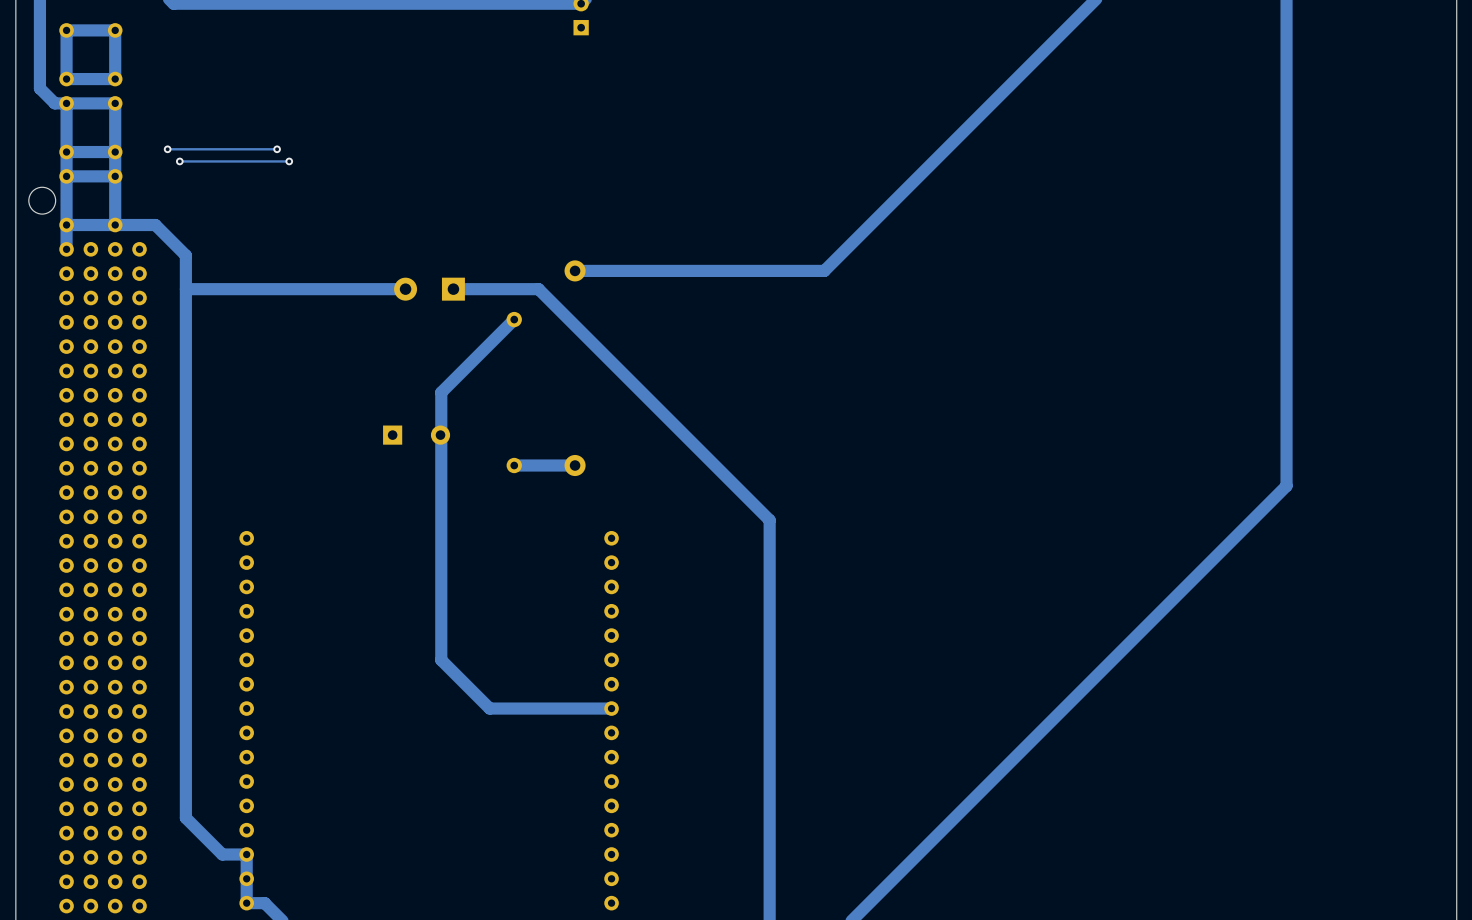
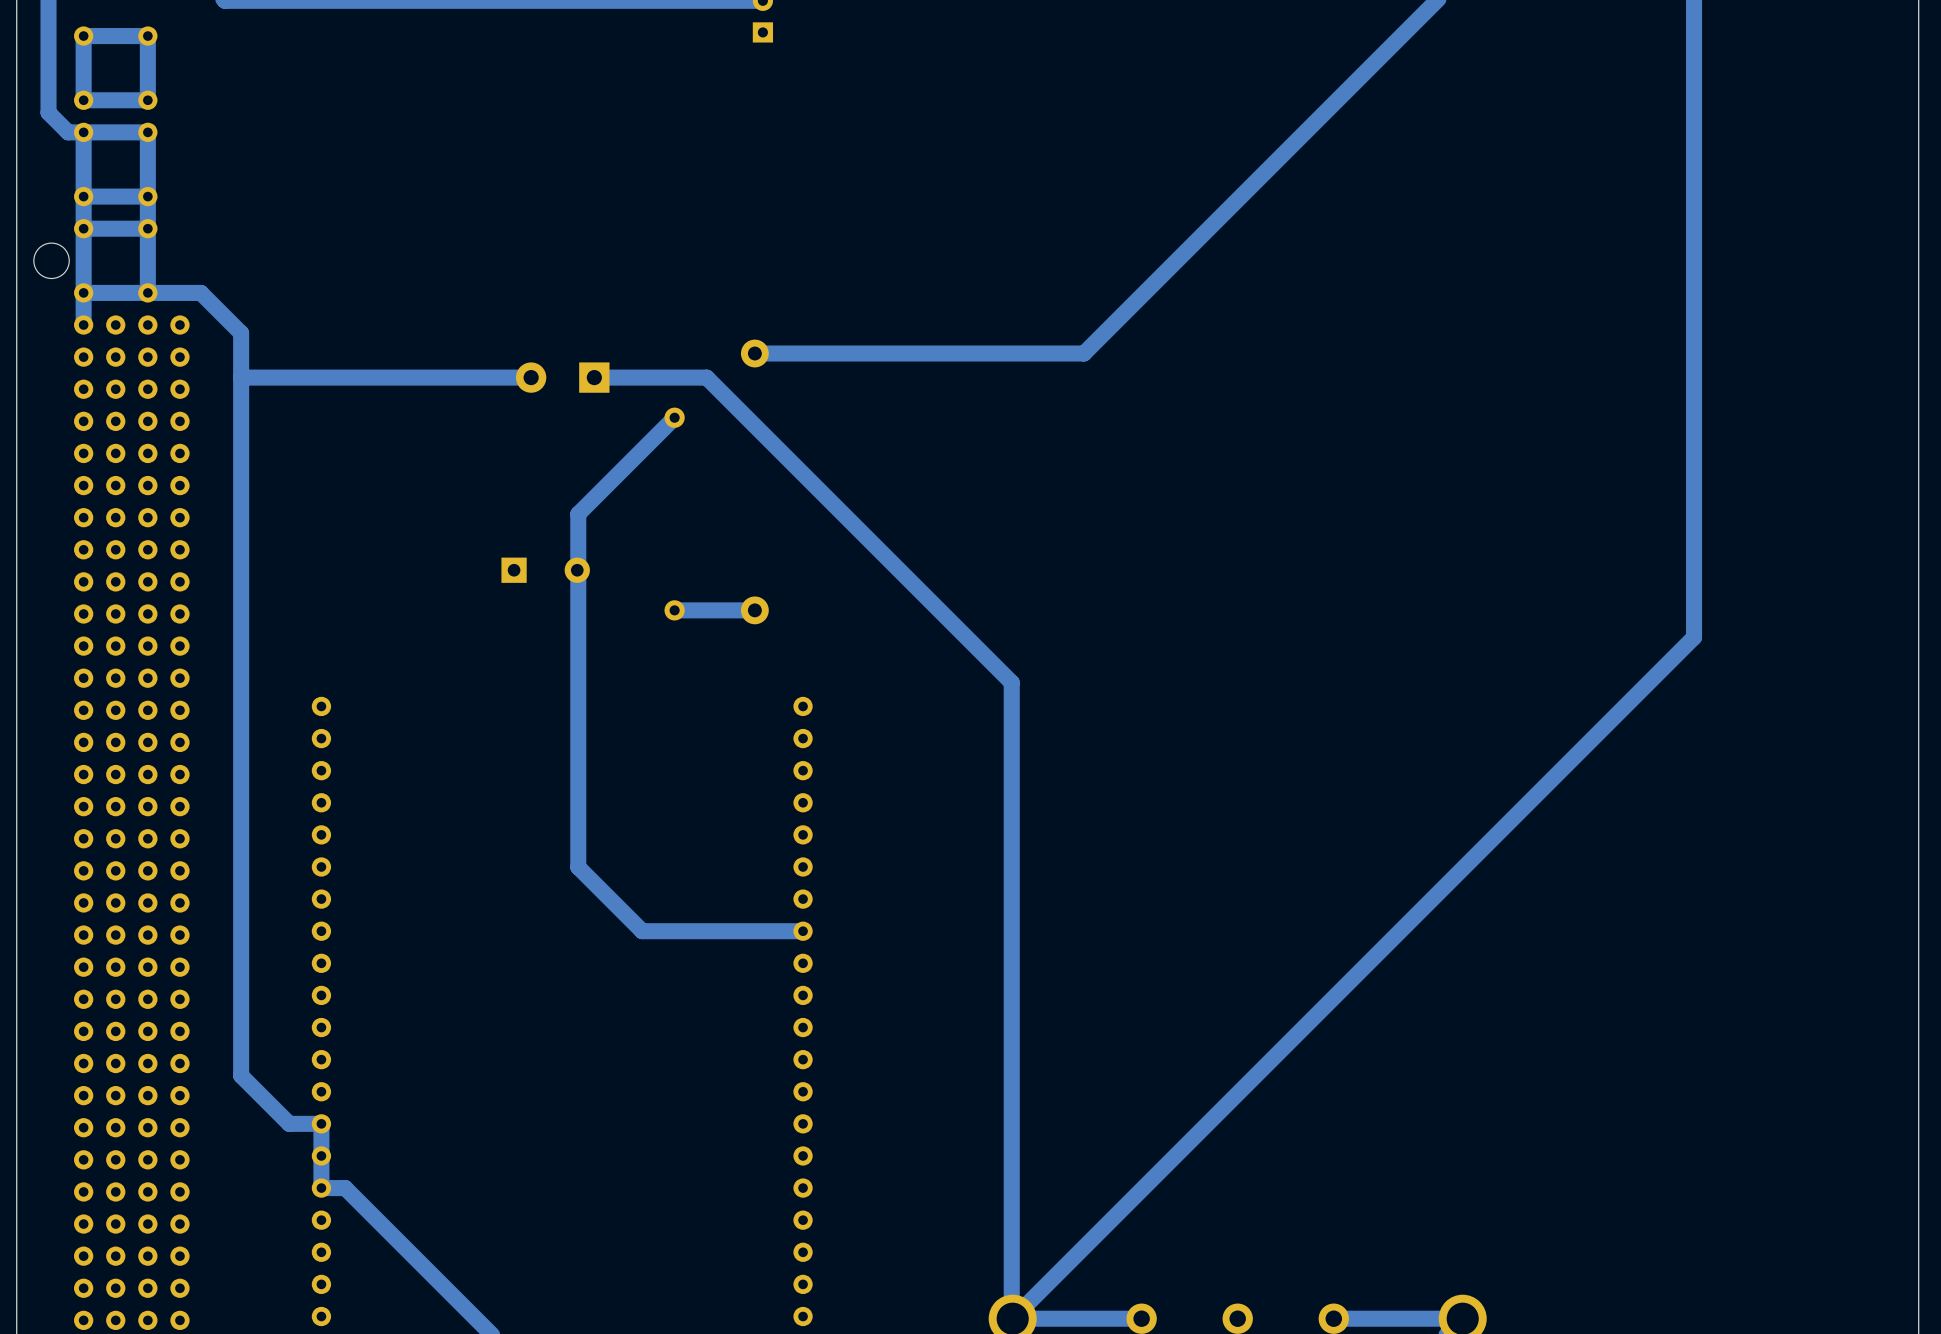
via: (167, 149) -> none
track: (277, 149) (167, 149) -> none
via: (277, 149) -> none
via: (179, 161) -> none
track: (289, 161) (179, 161) -> none
via: (289, 161) -> none

